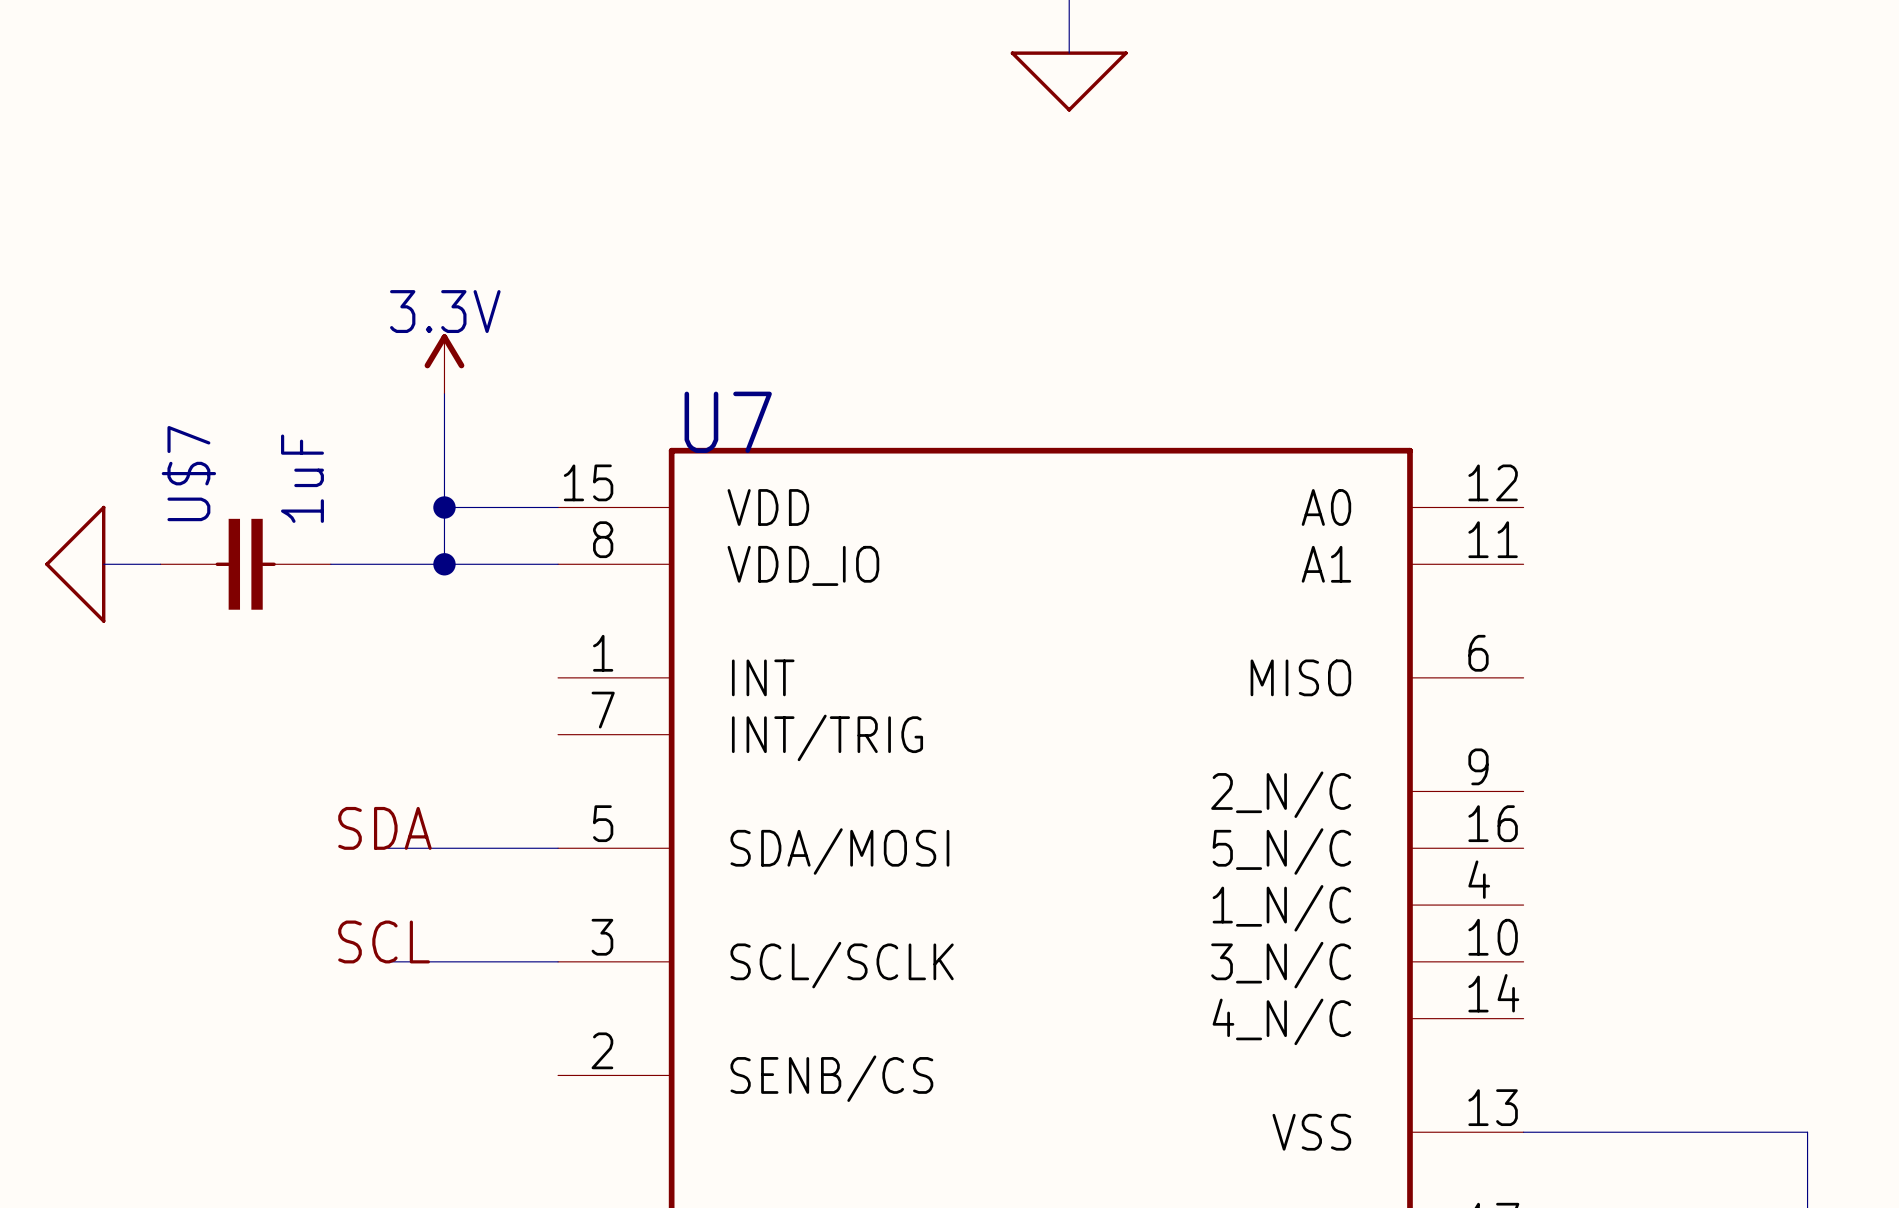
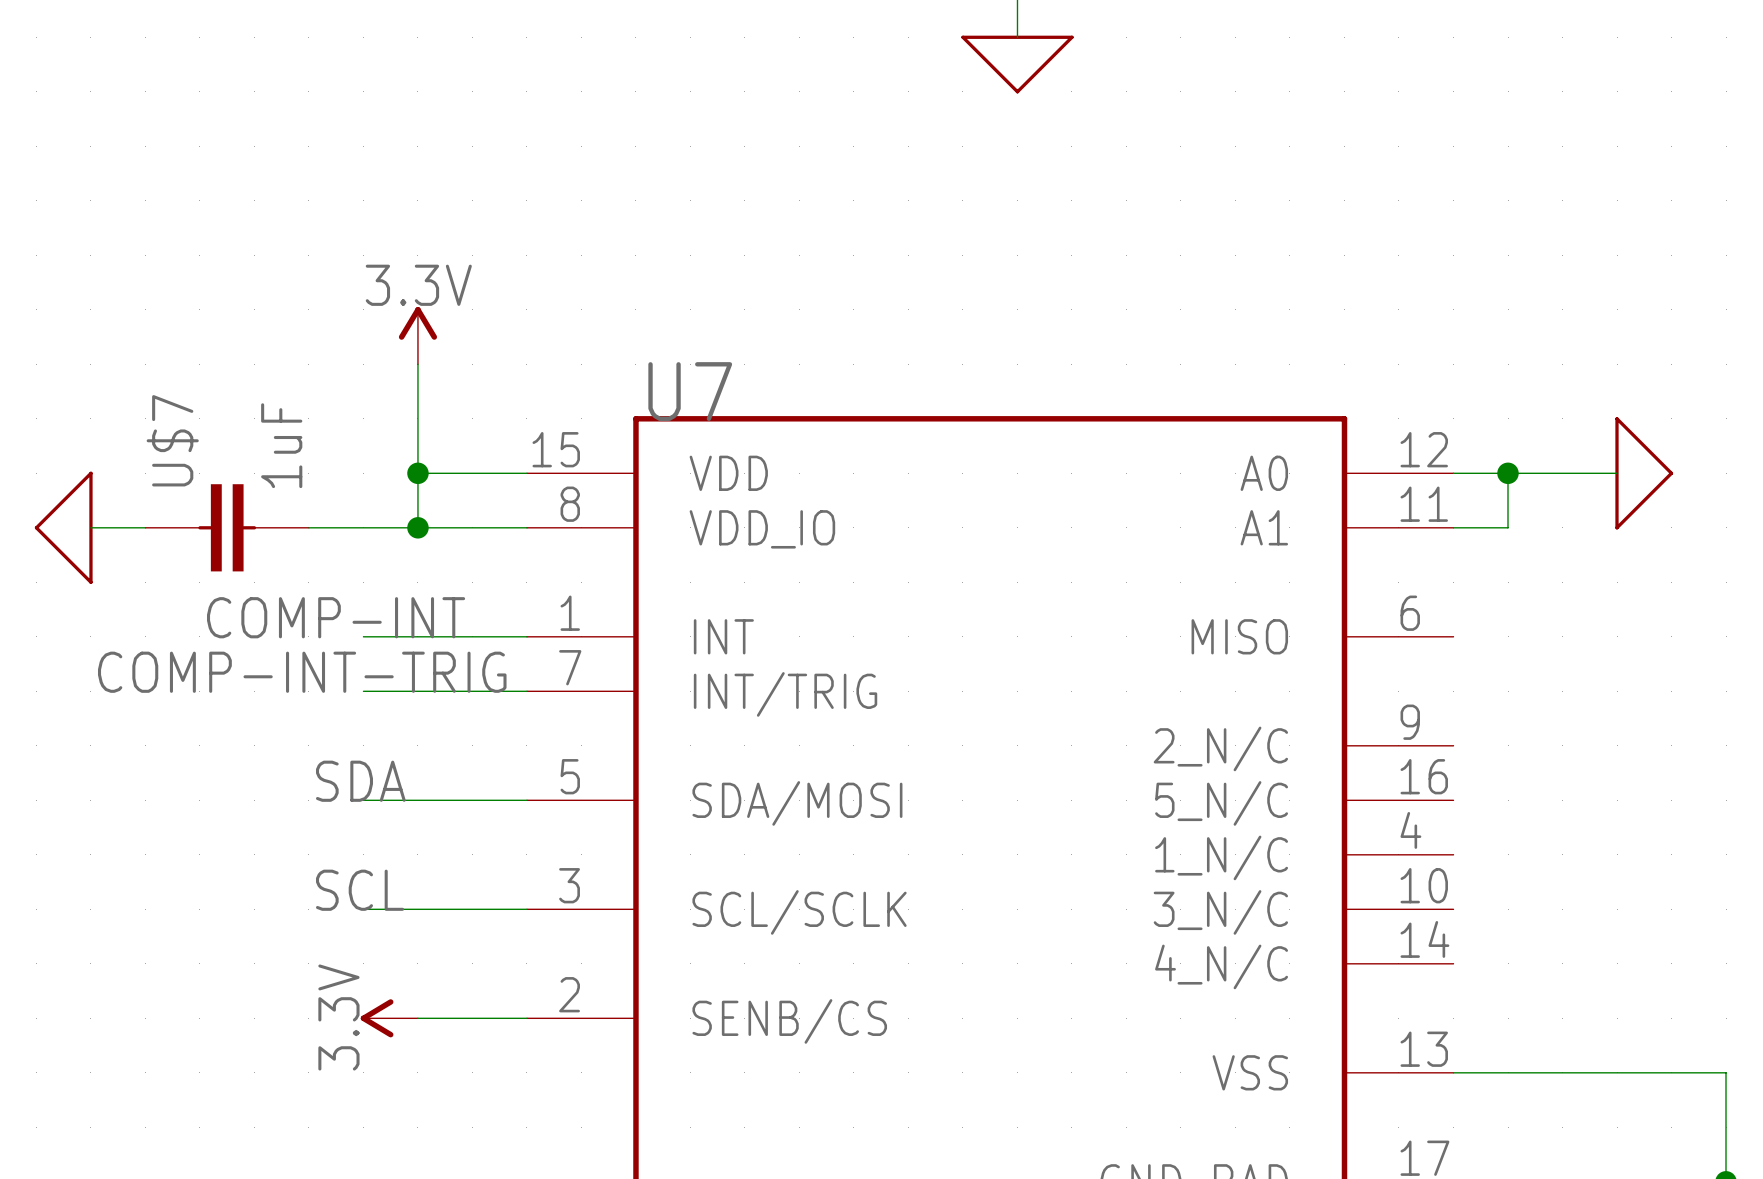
wire: none -> (1453, 473) (1617, 473)
wire: none -> (1508, 473) (1508, 527) (1453, 527)
junction: none -> (1508, 473)
power symbol: none -> (1644, 473)
label: none -> COMP-INT (336, 617)
wire: none -> (363, 636) (526, 636)
label: none -> COMP-INT-TRIG (302, 672)
wire: none -> (363, 691) (526, 691)
power symbol: none -> 3.3V (389, 1018)
wire: none -> (417, 1018) (526, 1018)

